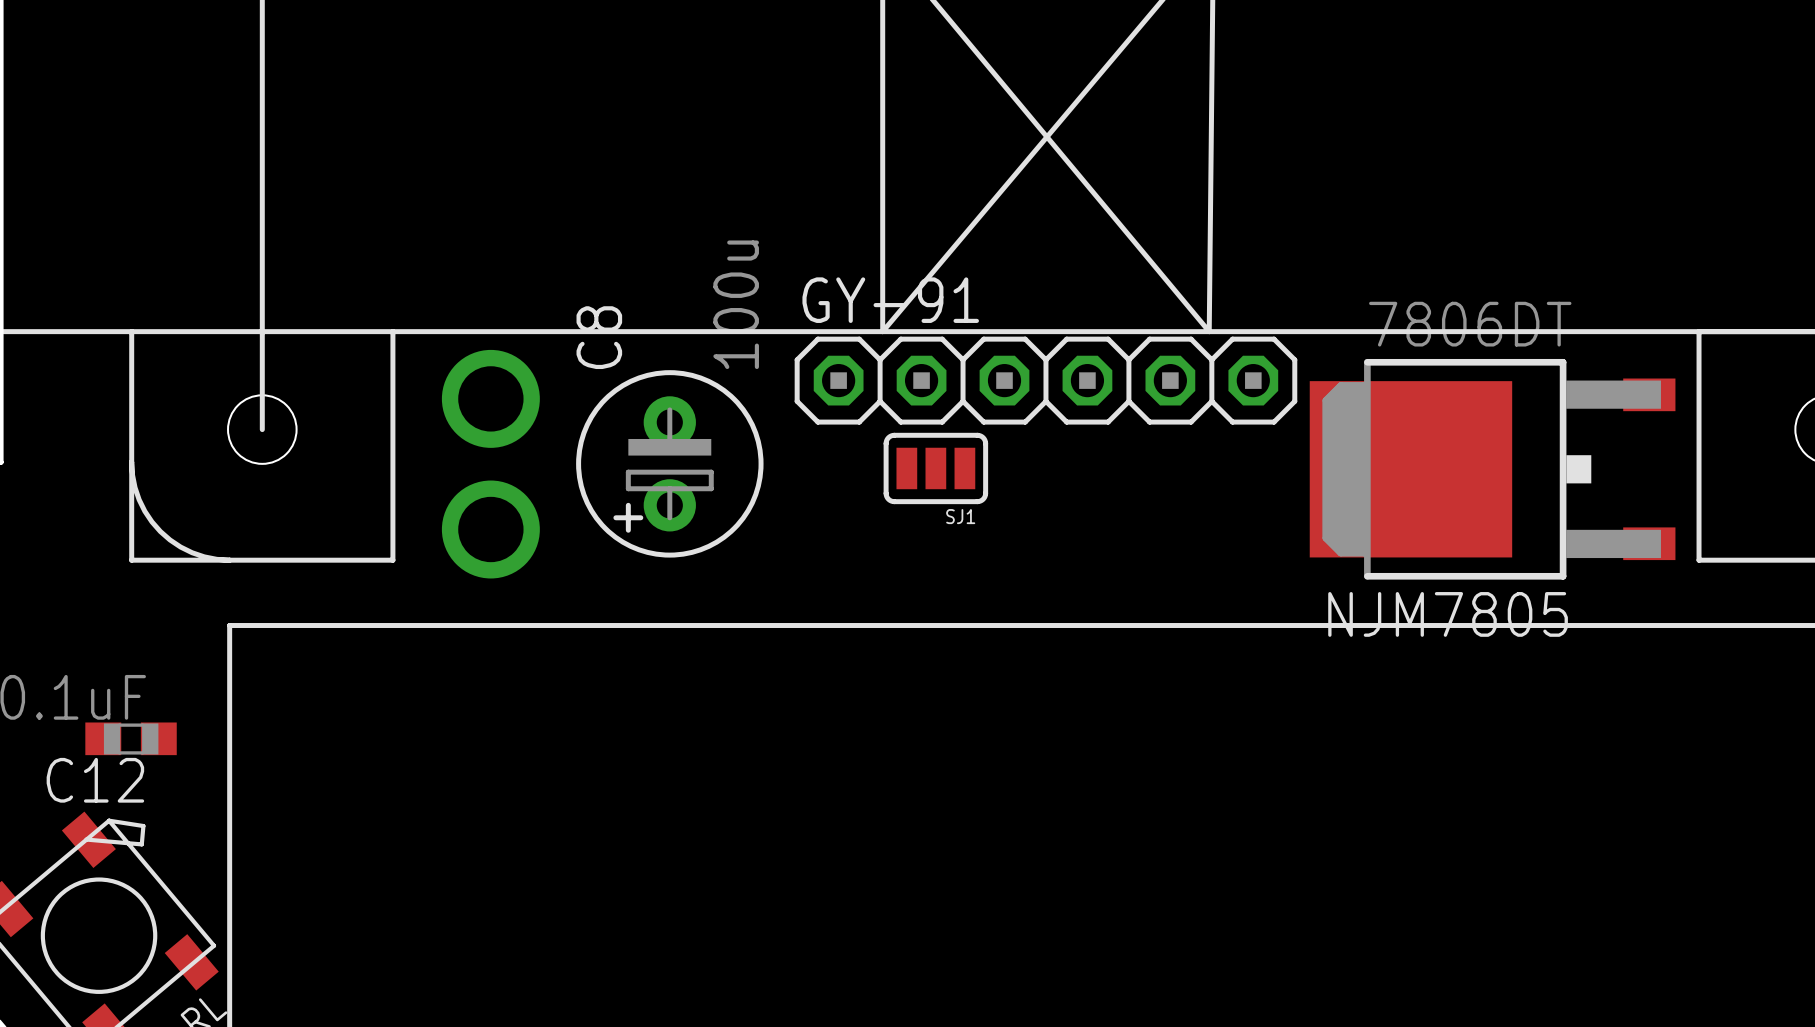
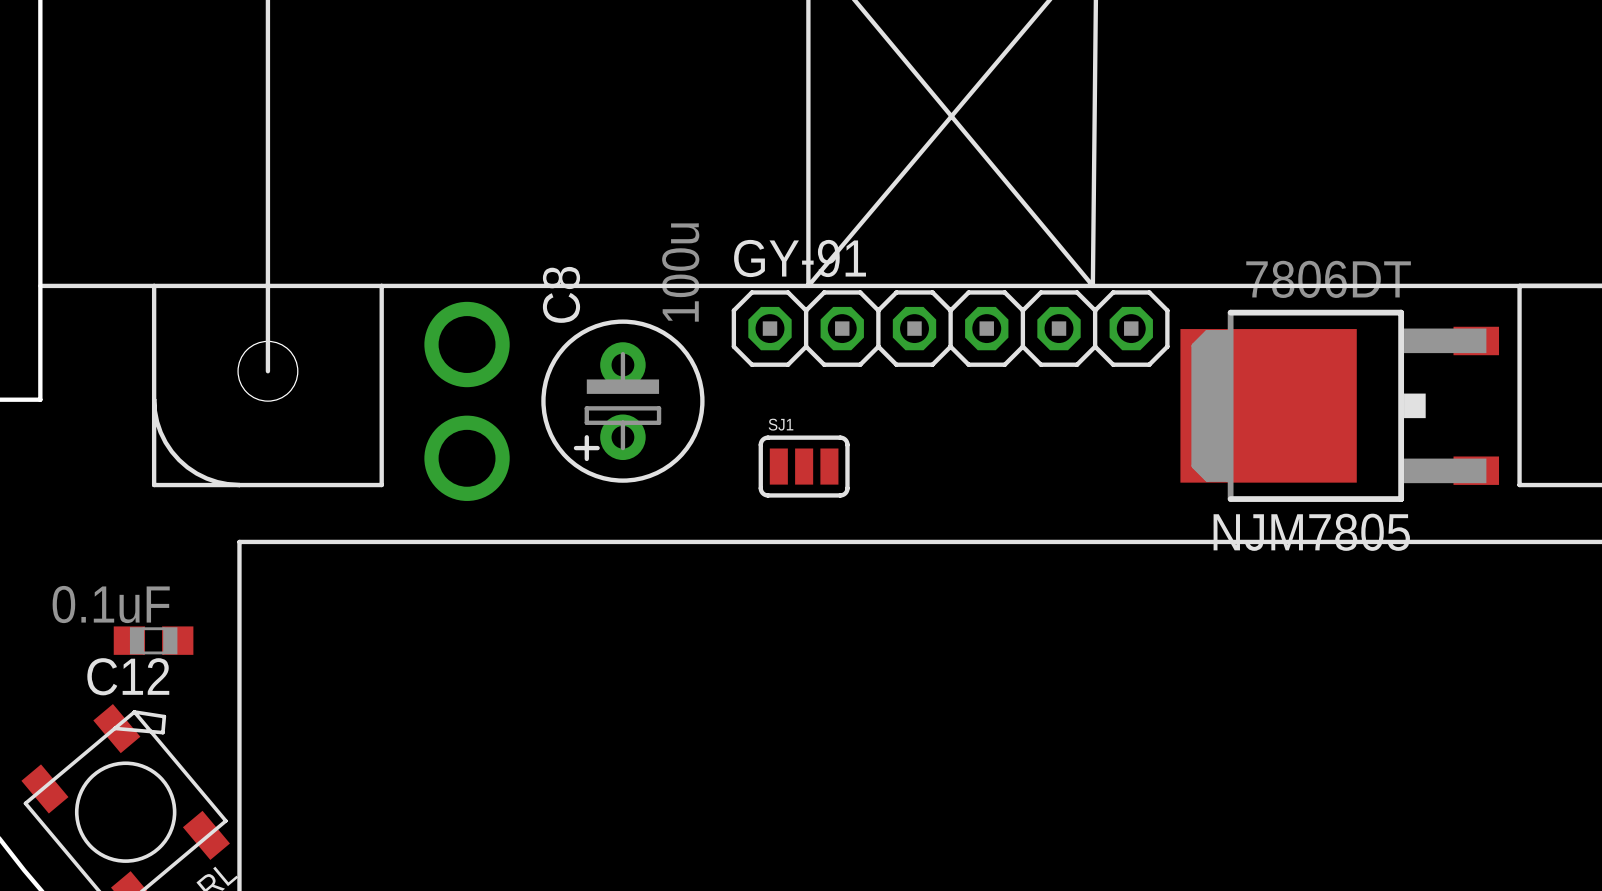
SJ1 position: (935, 468) -> (804, 466)
SJ1 name position: SJ1 (960, 516) -> SJ1 (781, 424)

